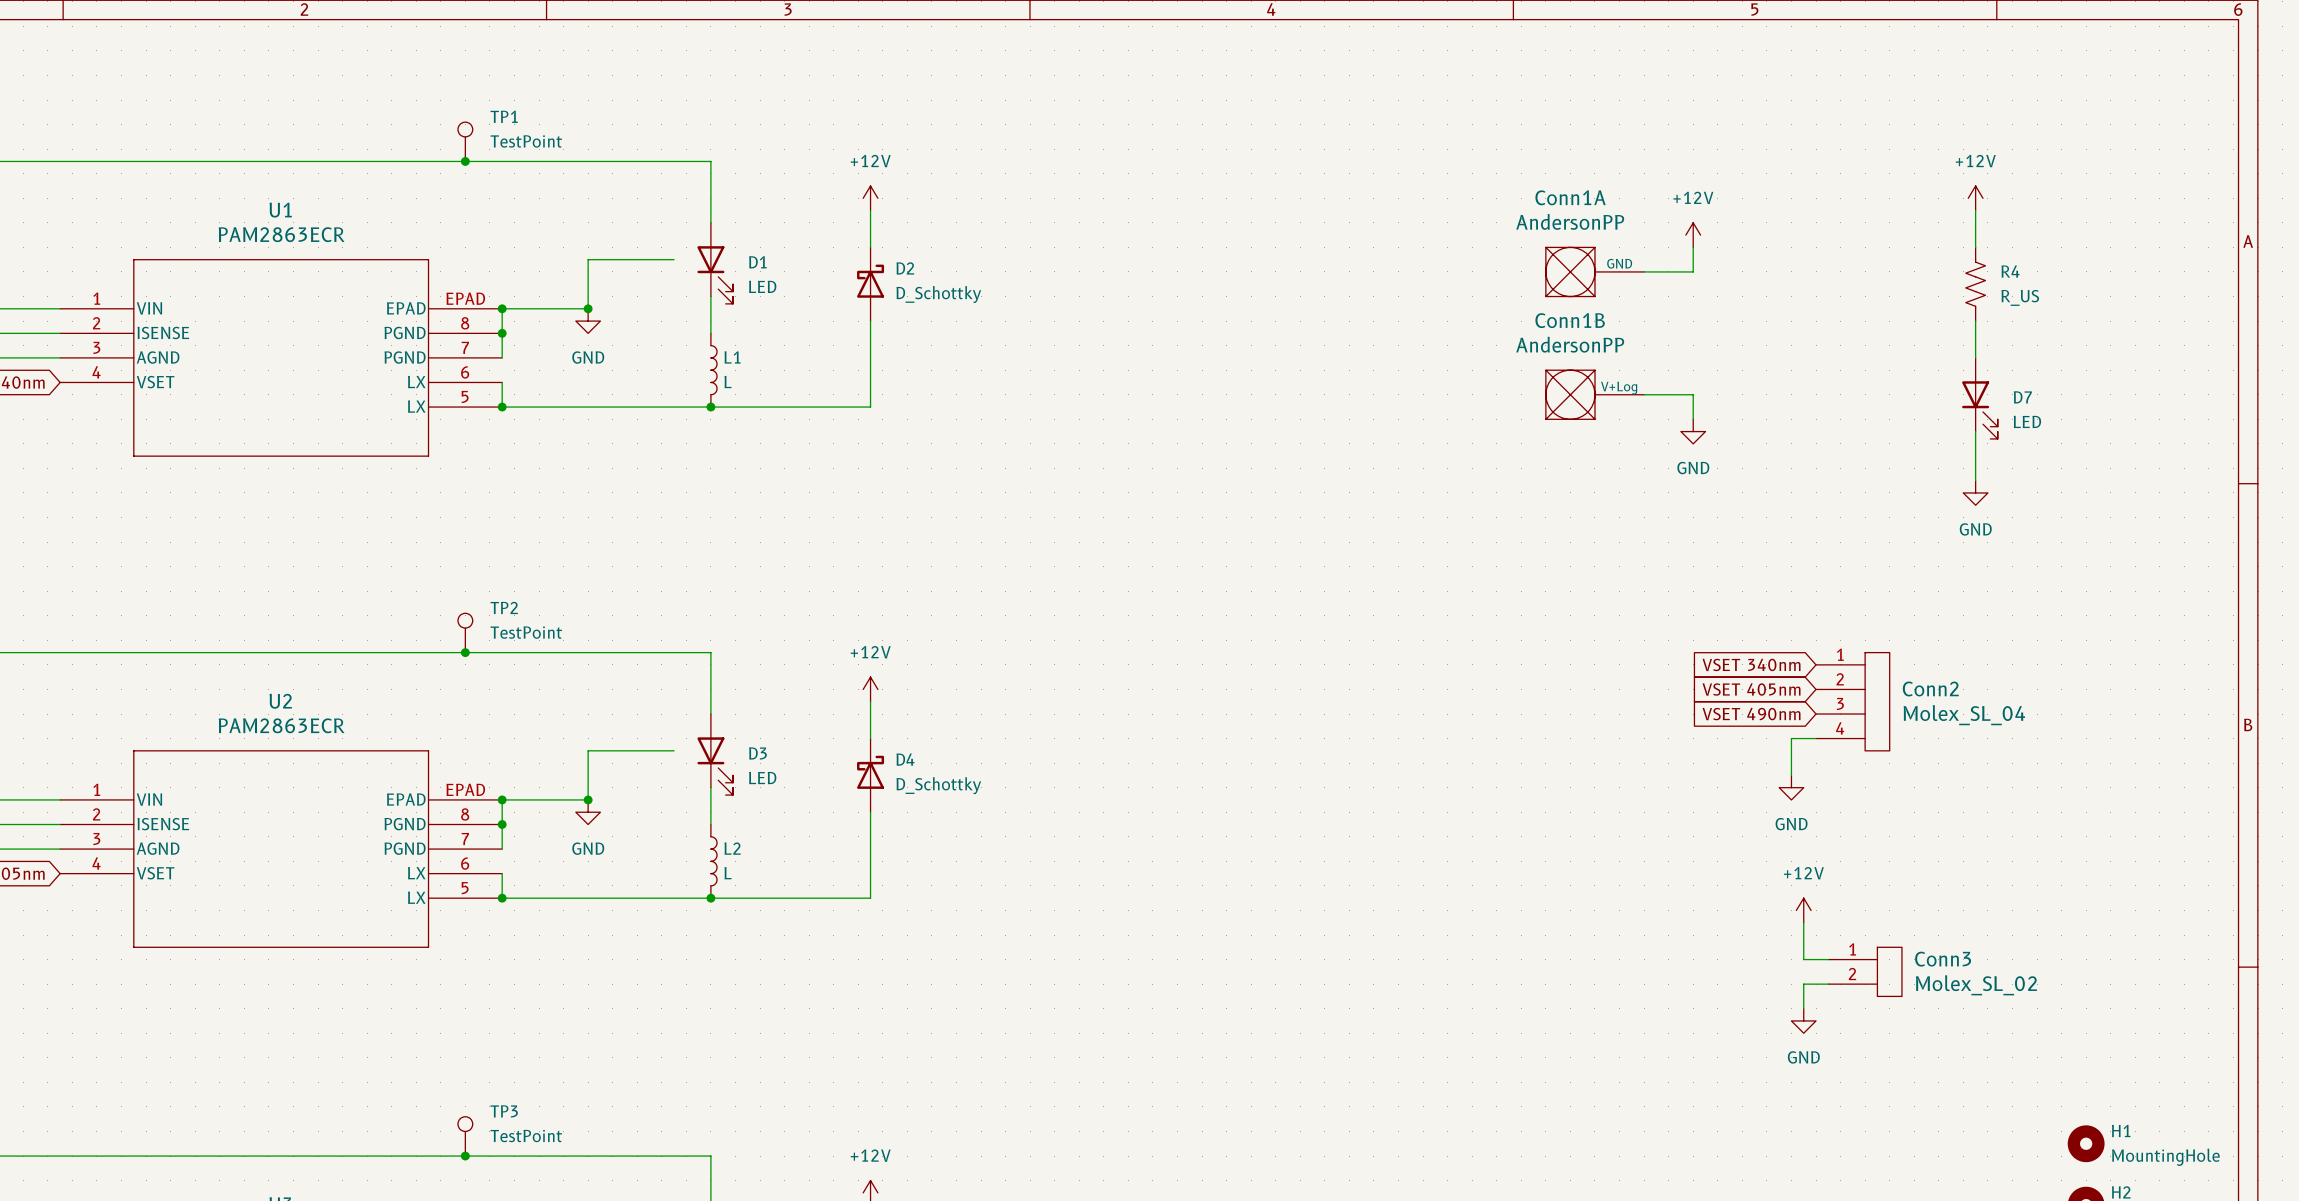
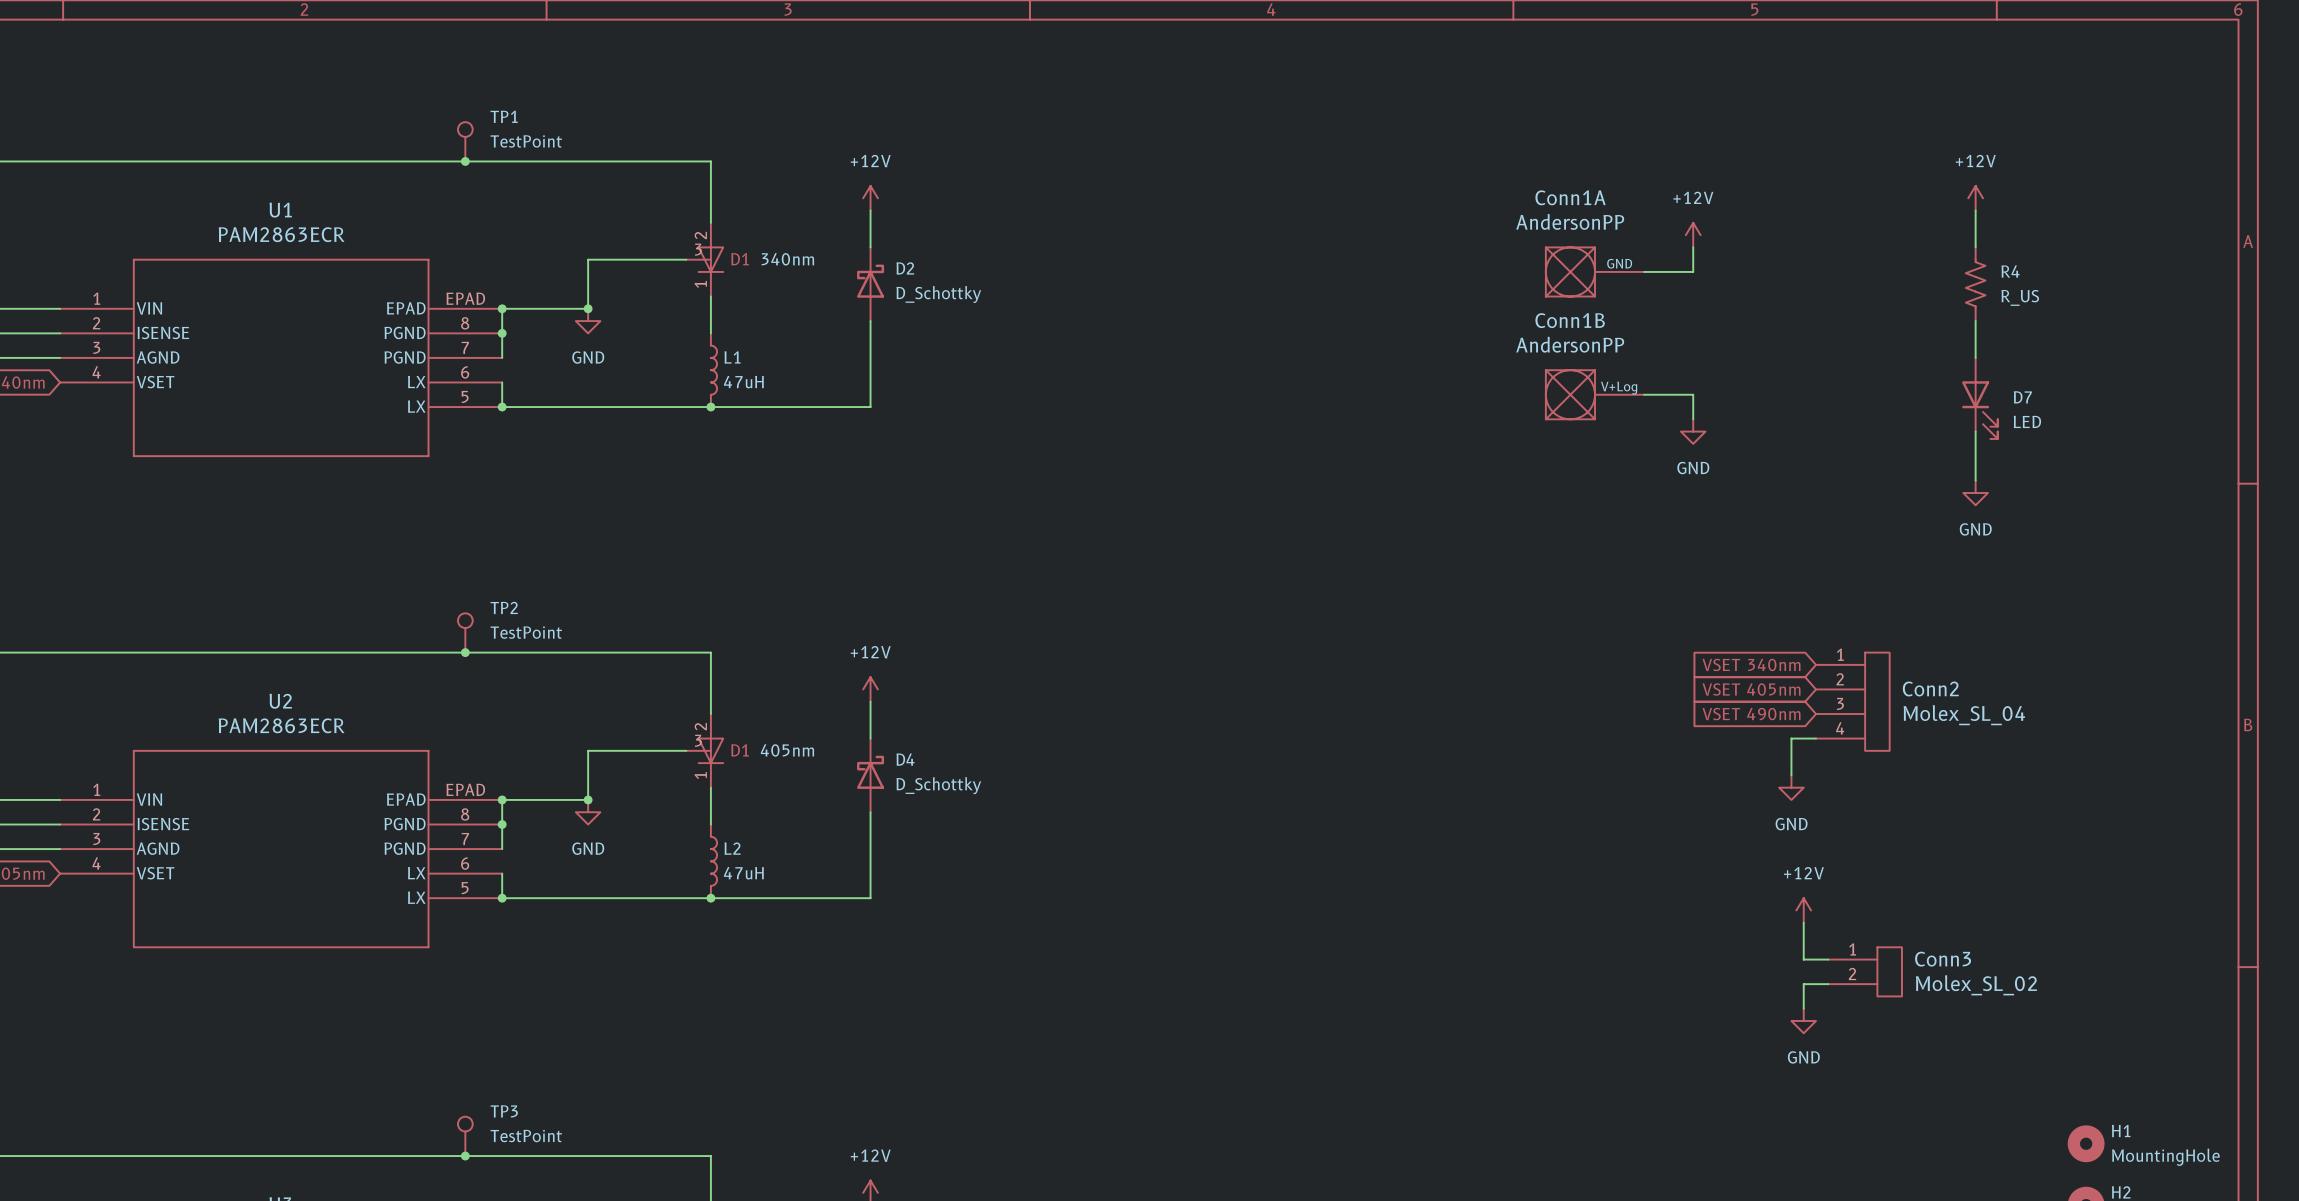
wire: none -> (674, 259) (686, 259)
part: none -> 340nm (704, 259)
D1: LED (715, 263) -> none
L1 value: L (728, 382) -> 47uH (743, 382)
wire: none -> (674, 750) (686, 750)
part: none -> 405nm (704, 750)
D3: LED (715, 754) -> none
L2 value: L (728, 873) -> 47uH (743, 873)

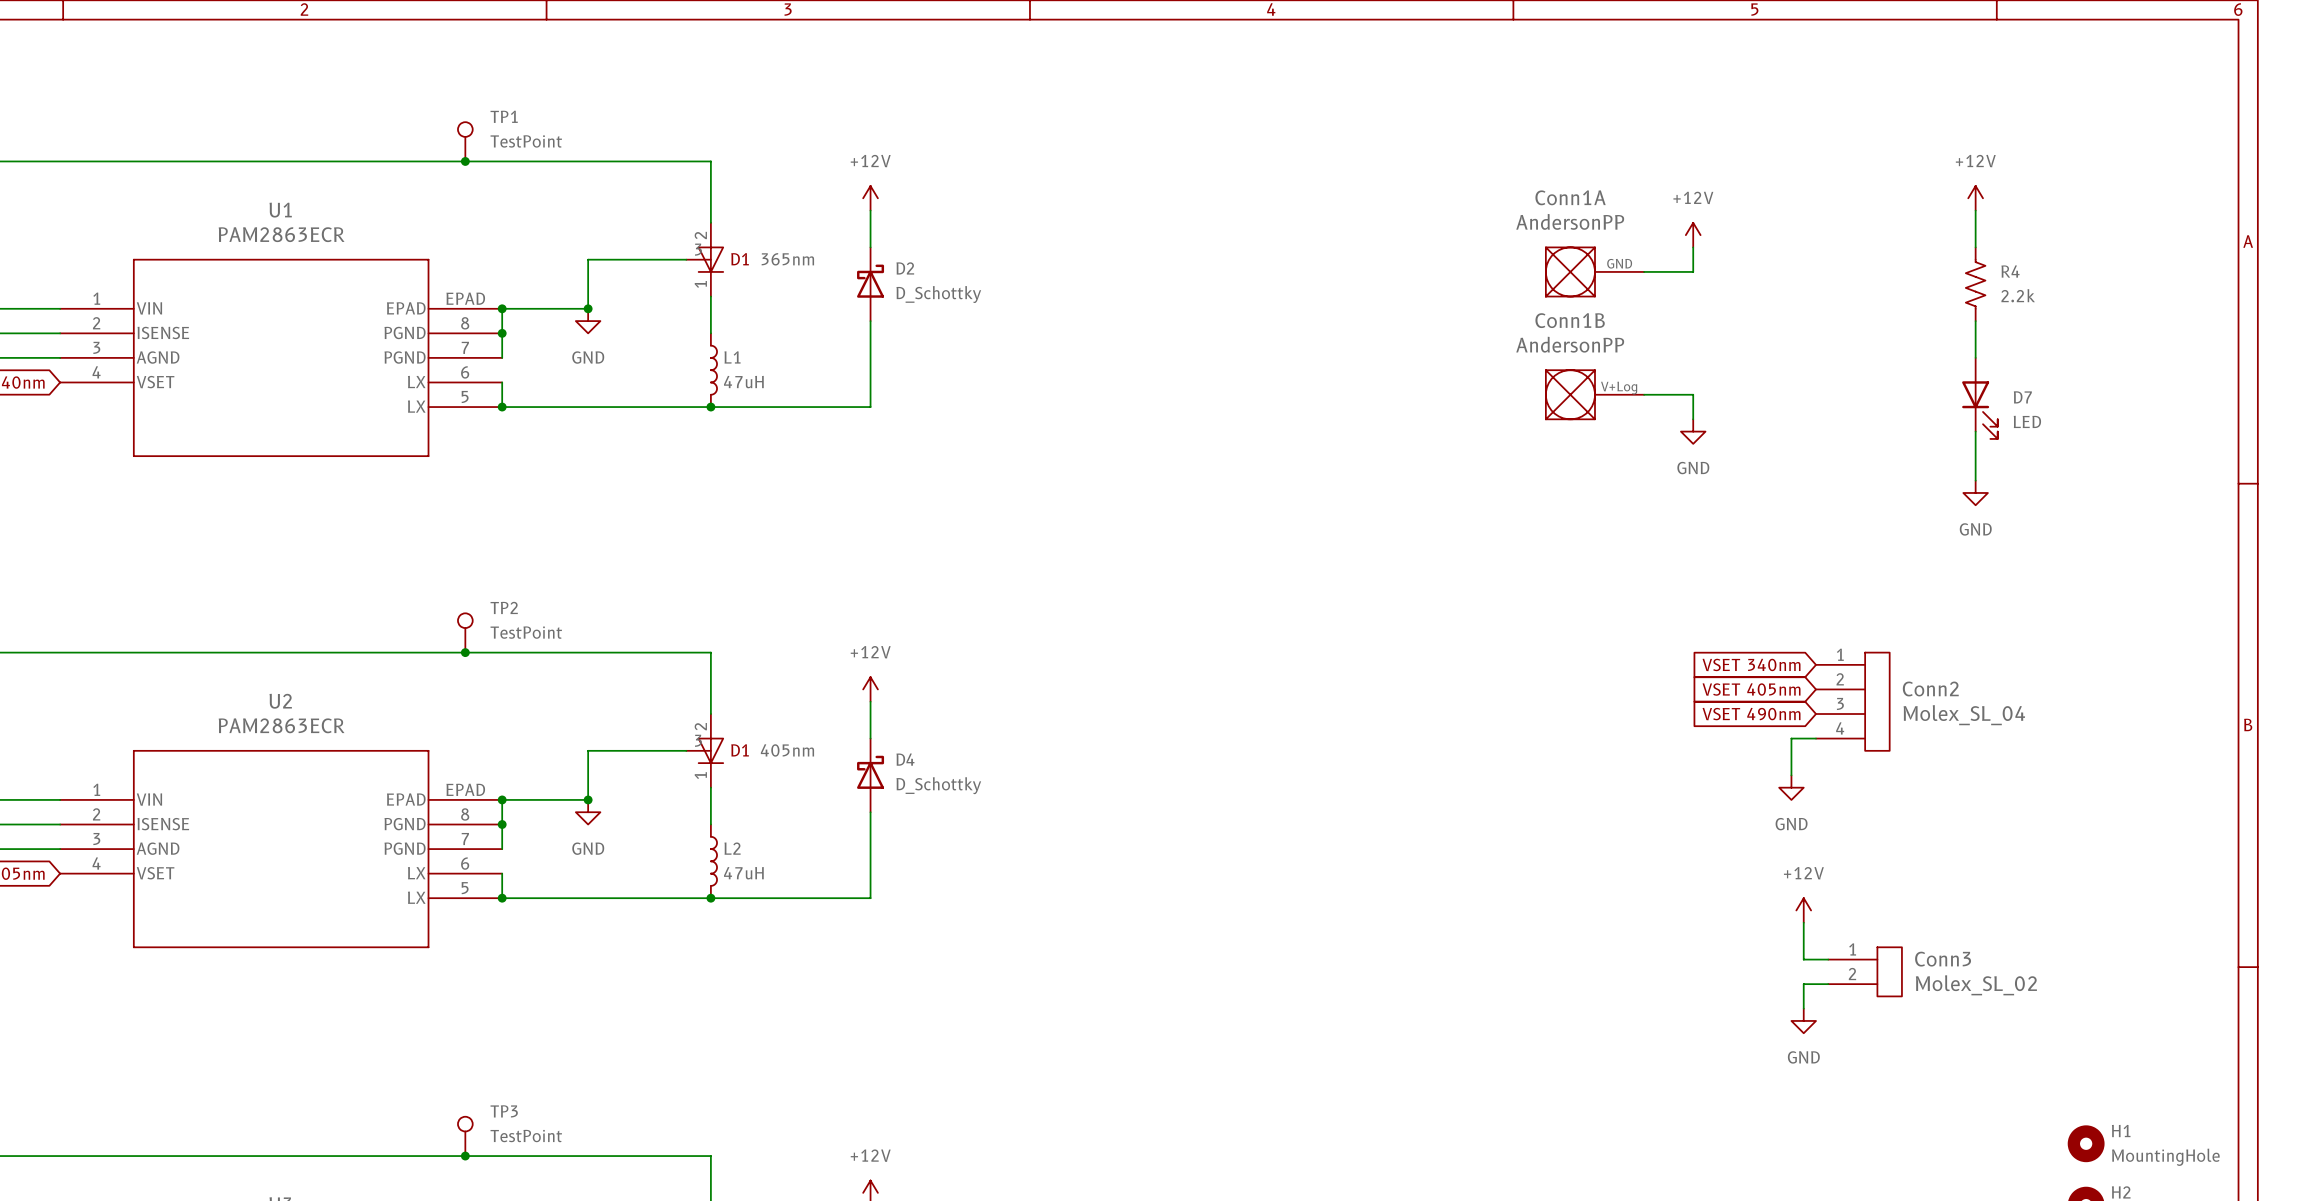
part value: 340nm (787, 259) -> 365nm (787, 259)
R4 value: R_US (2020, 297) -> 2.2k (2018, 295)

